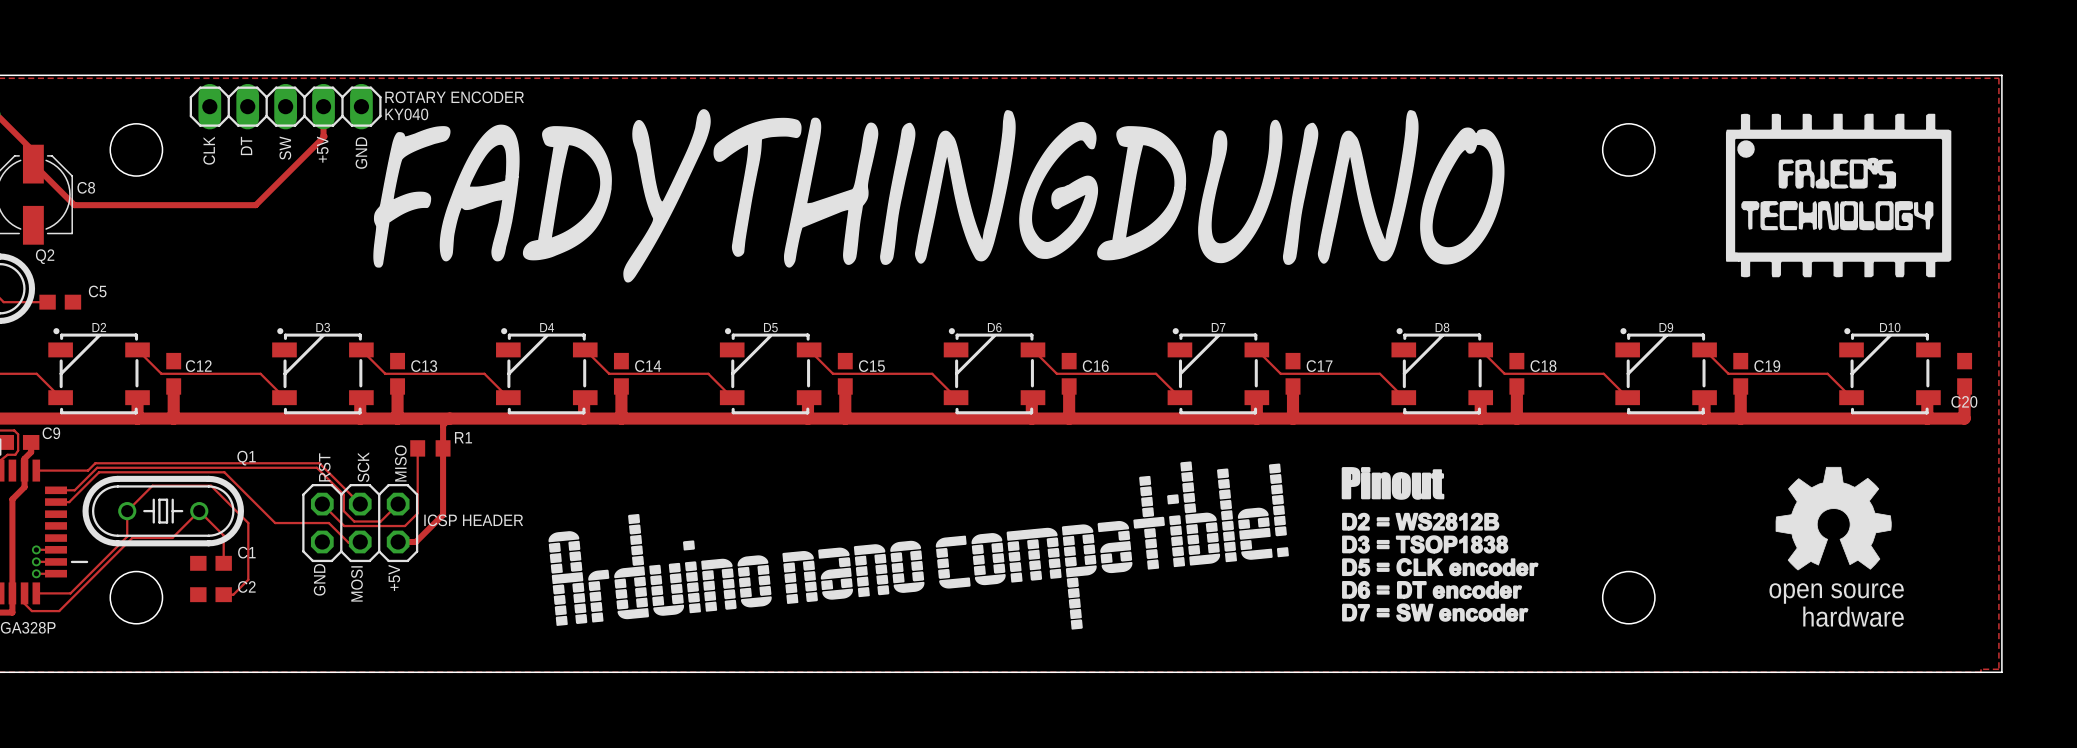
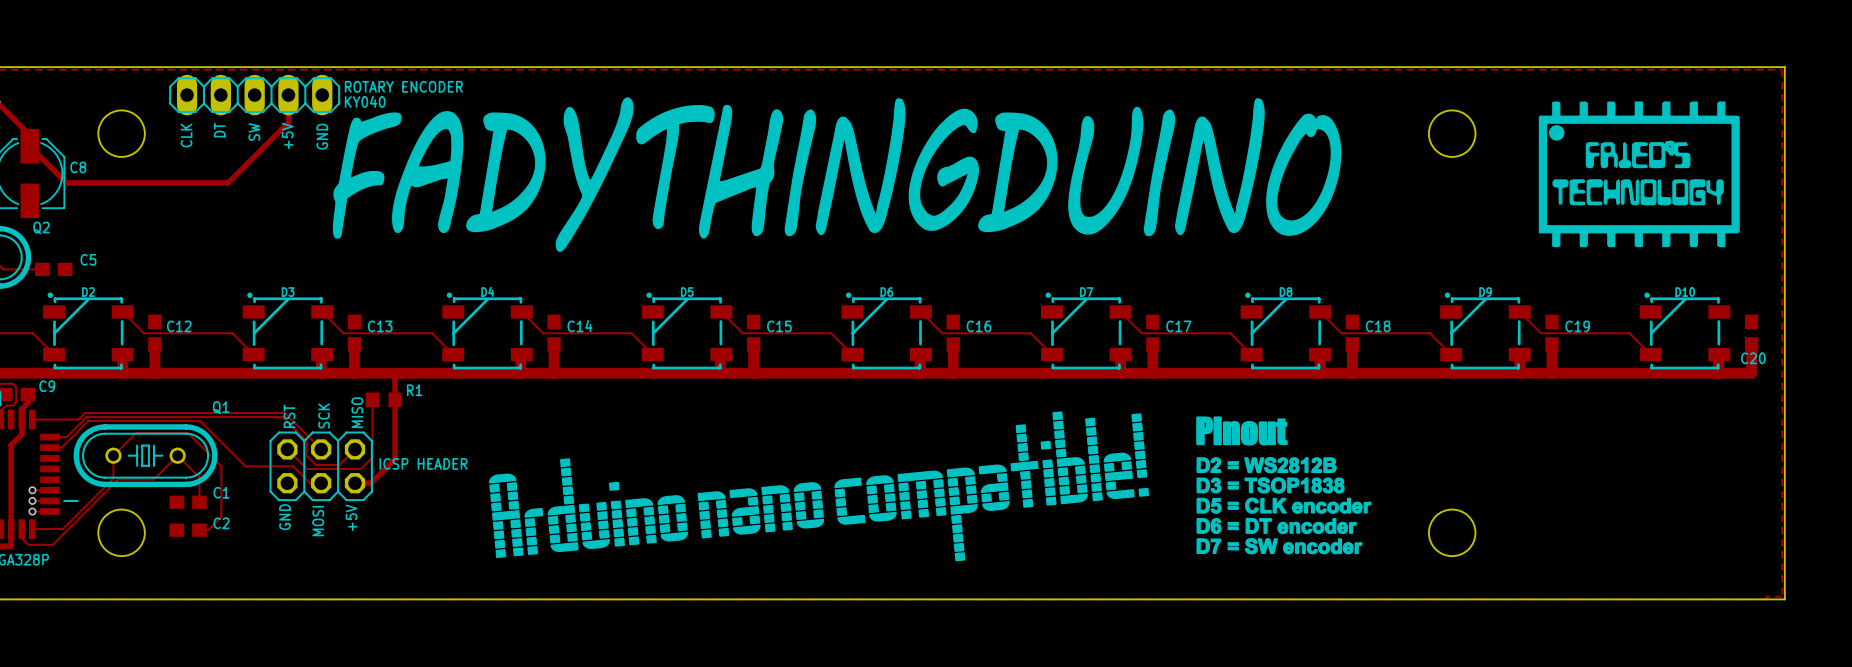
drawing: [1775, 466, 1892, 571] -> none

